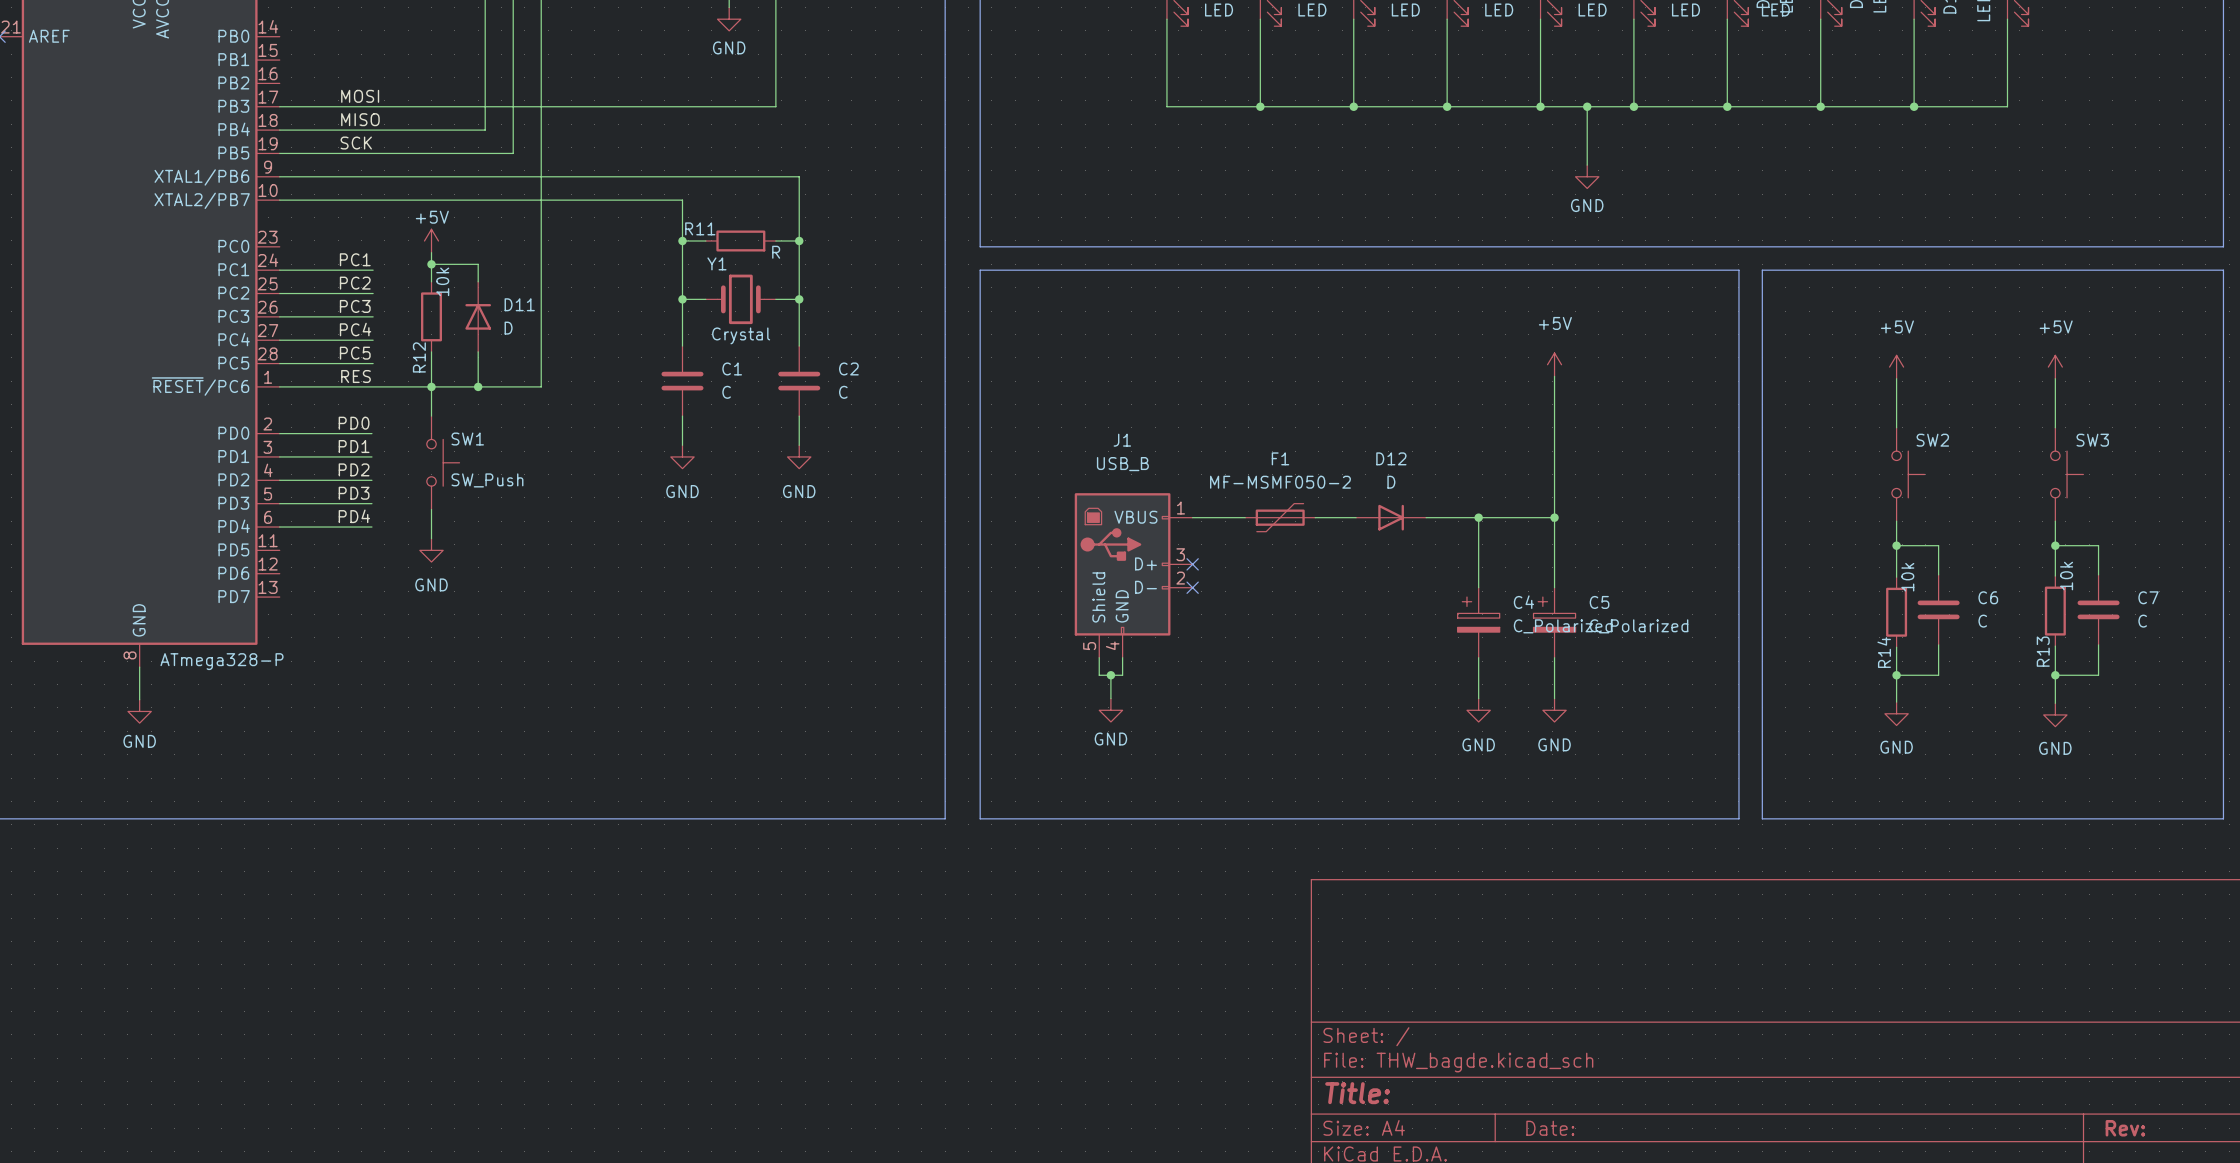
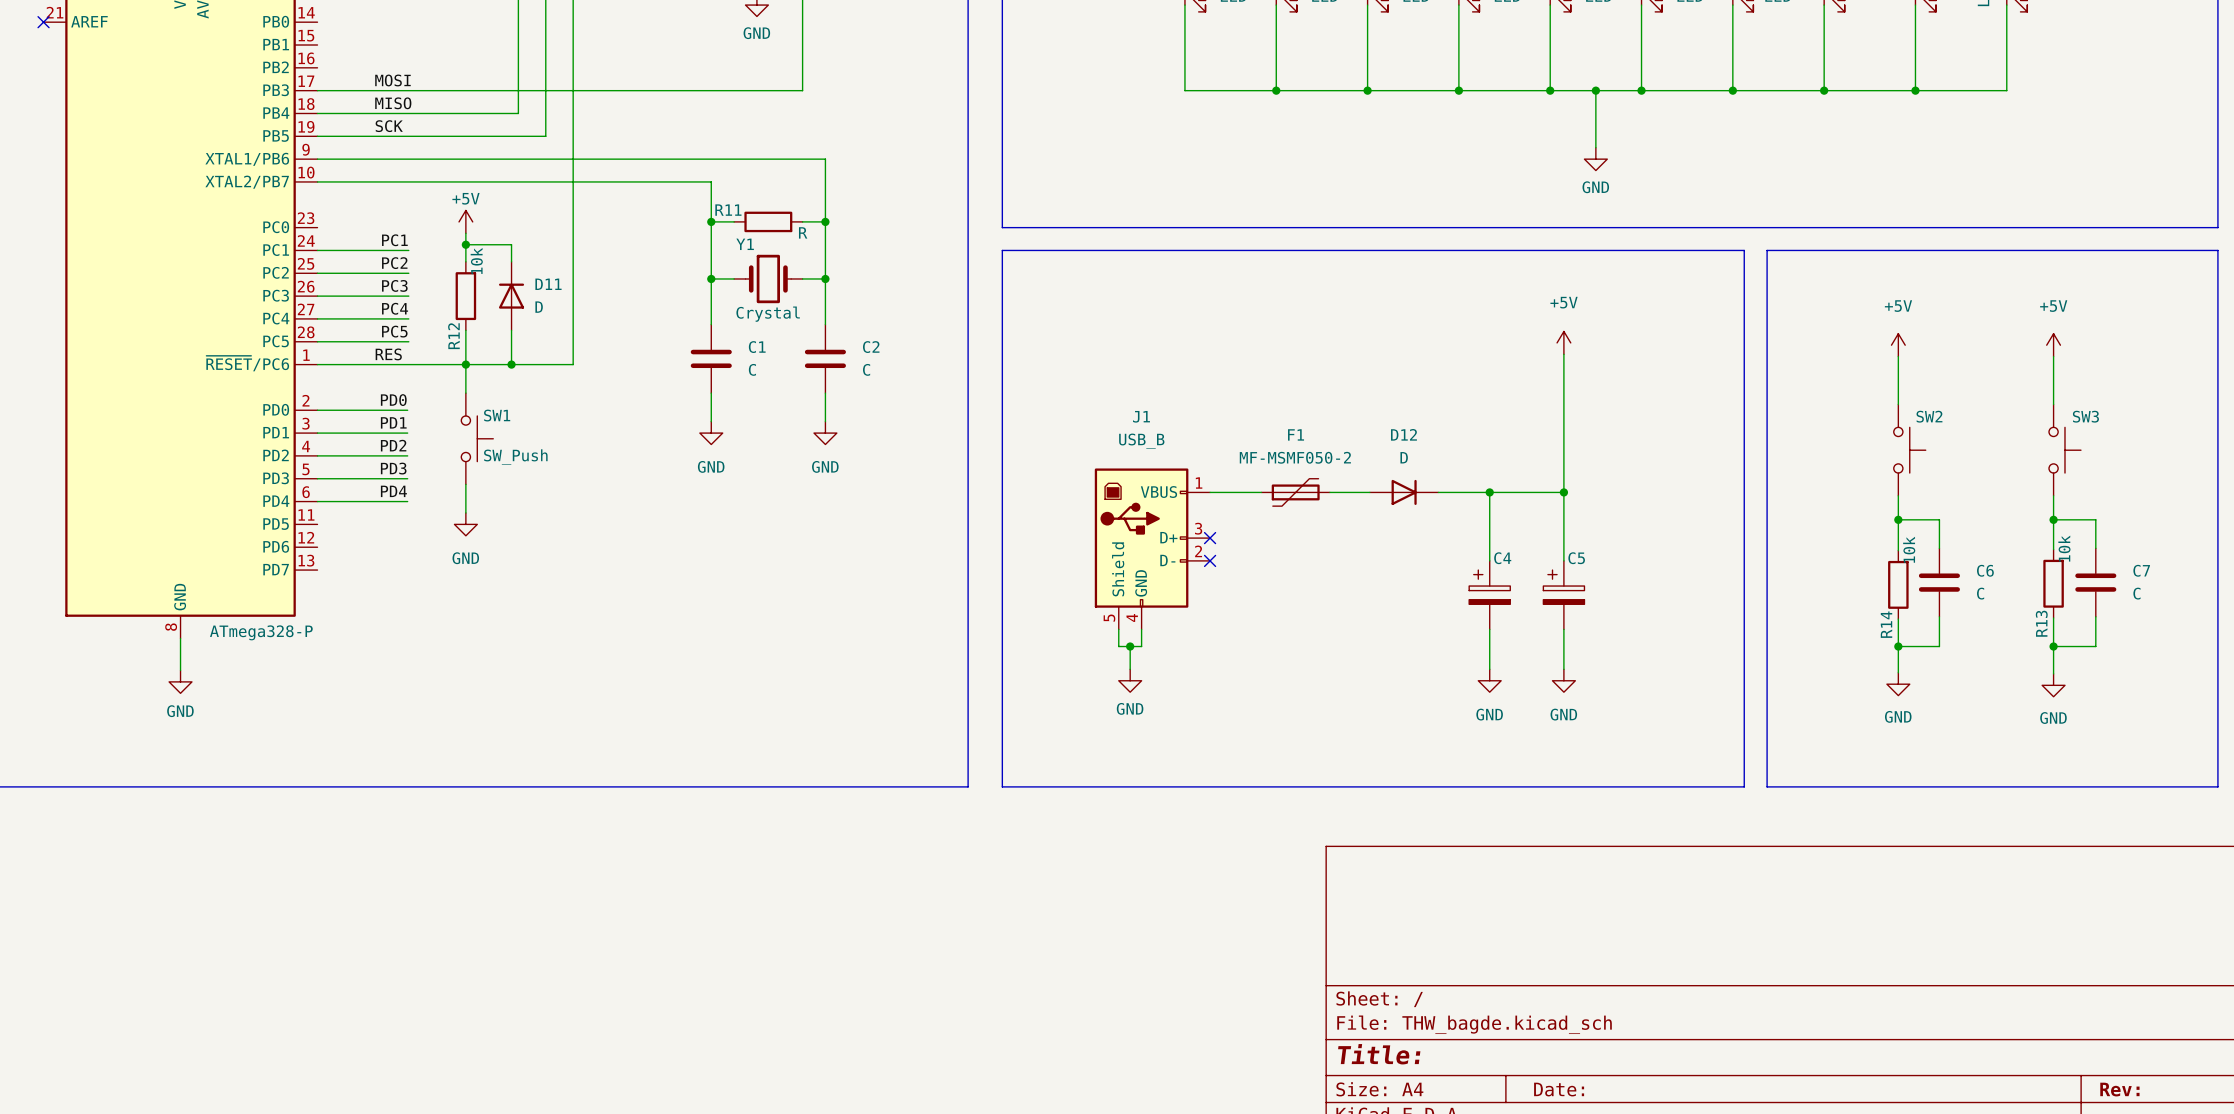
C4 name position: C4 (1523, 602) -> C4 (1502, 558)
C5 name position: C5 (1599, 602) -> C5 (1576, 558)
C4 value: C_Polarized (1563, 626) -> none
C5 value: C_Polarized (1639, 626) -> none

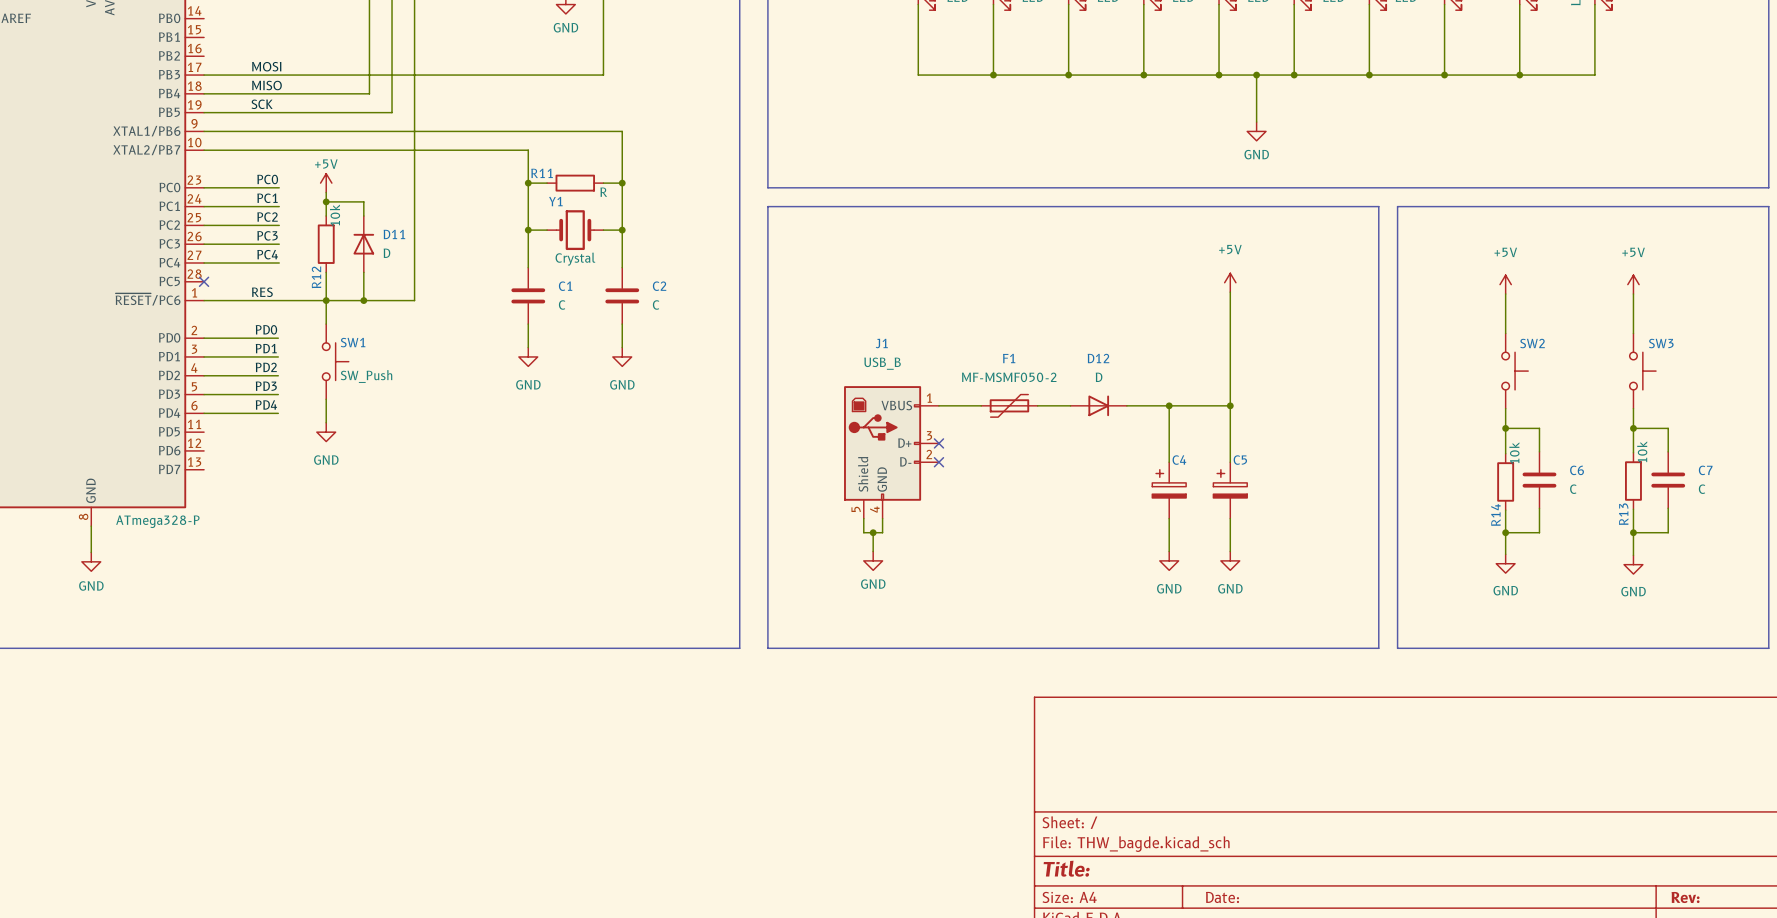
label: none -> PC0 (267, 179)
label: PC5 (394, 331) -> none
wire: (317, 341) (408, 341) -> (204, 187) (279, 187)
no-connect mark: none -> (204, 281)

